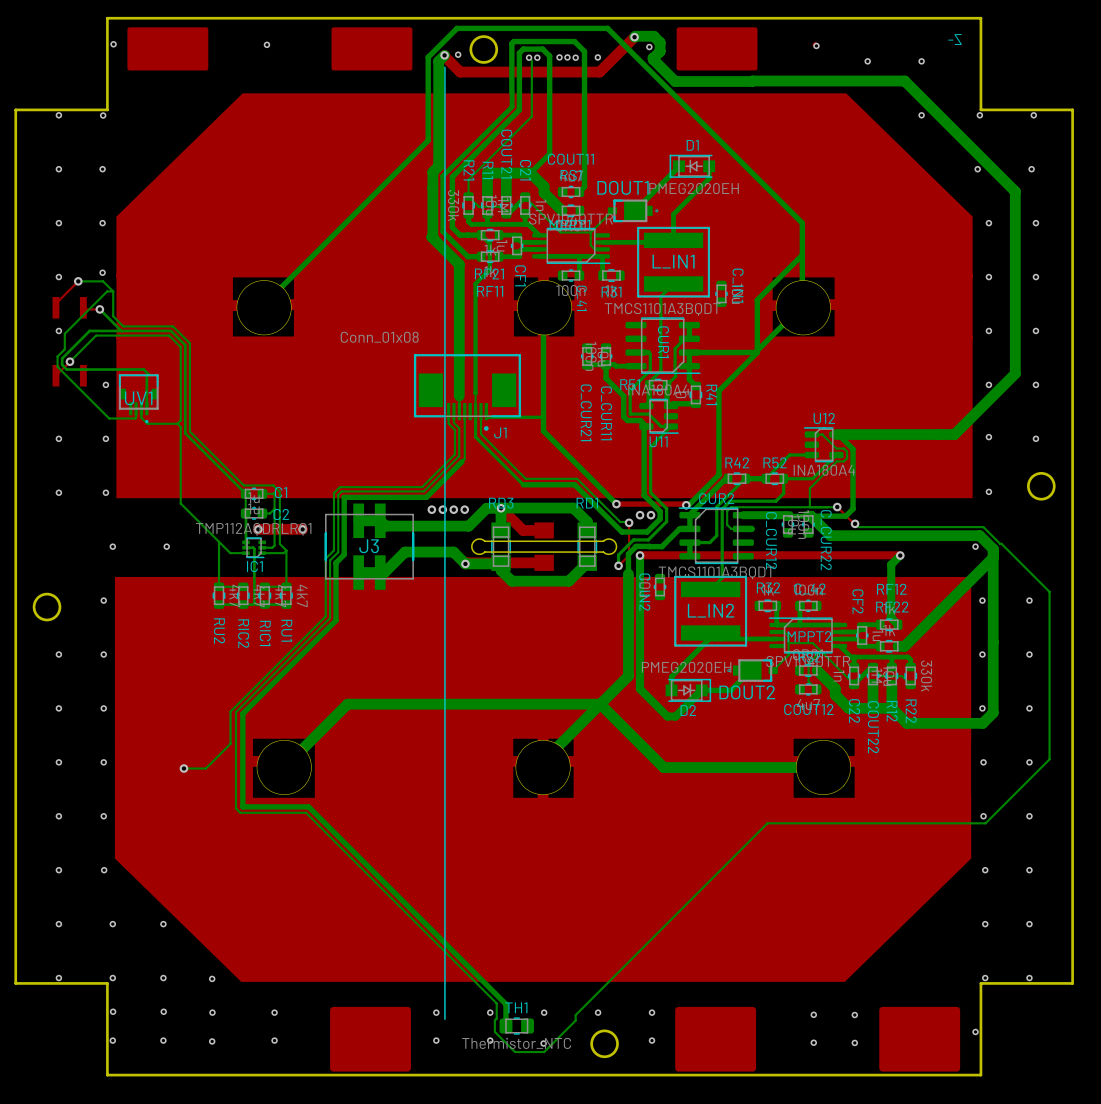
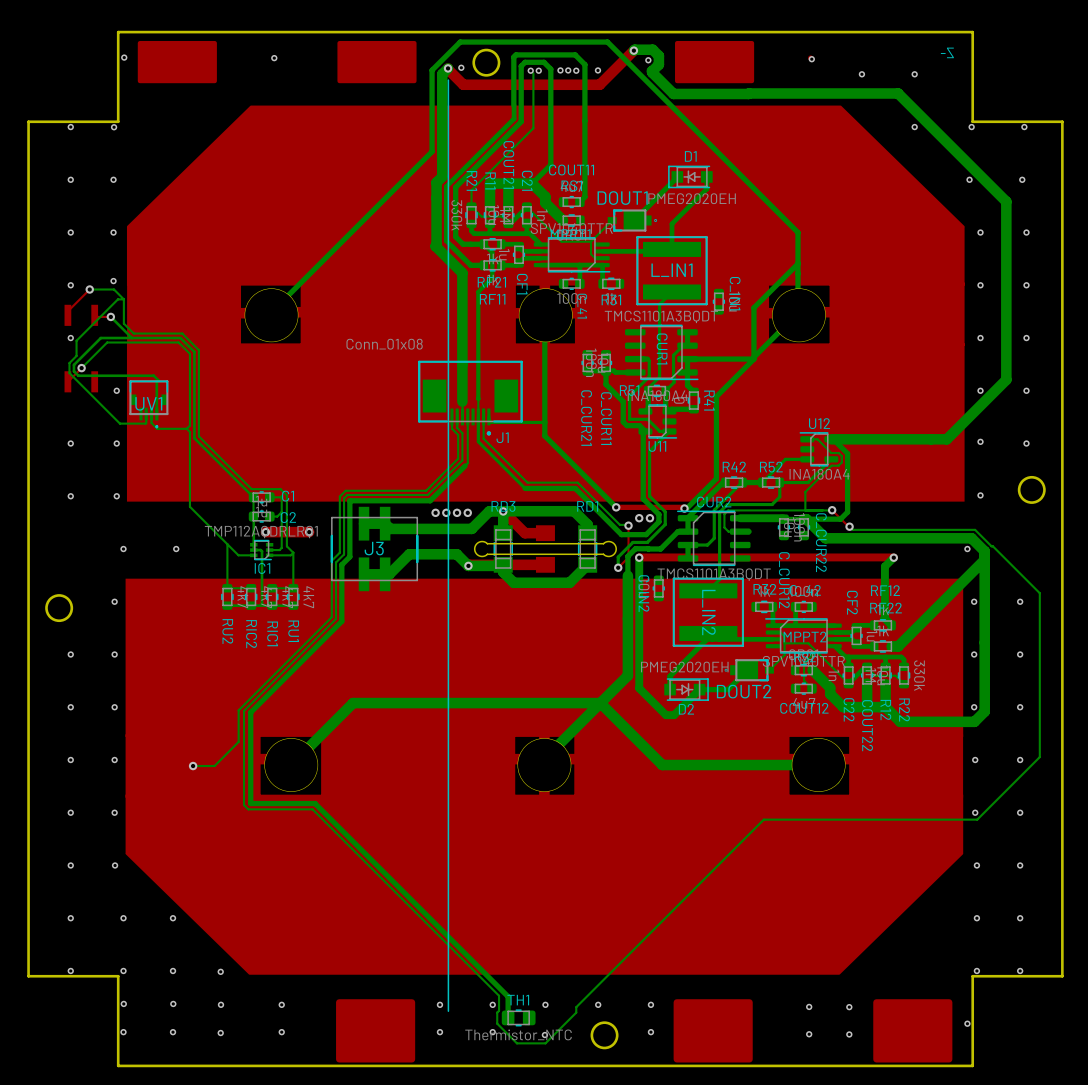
C_CUR12 name position: C_CUR12 (771, 540) -> C_CUR12 (784, 580)
L_IN2 name rotation: 0° (711, 610) -> 90° clockwise (708, 612)

